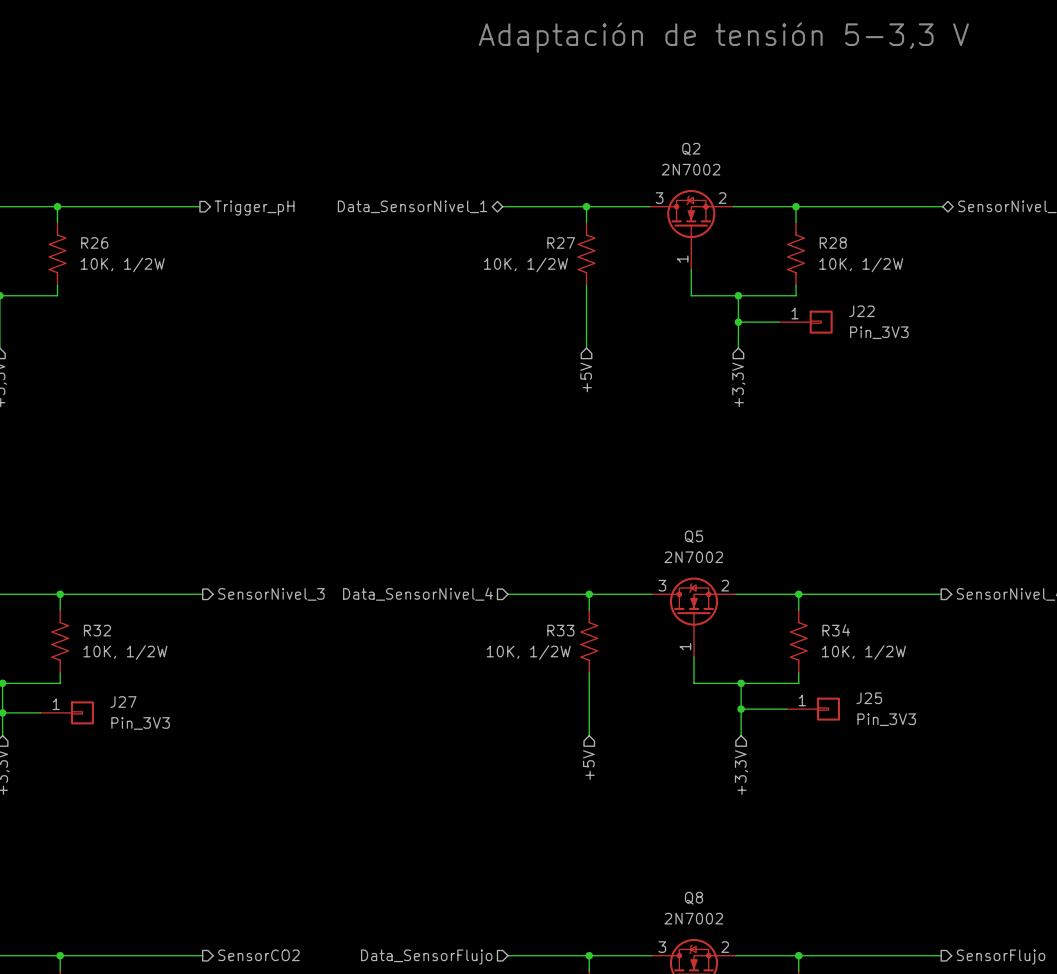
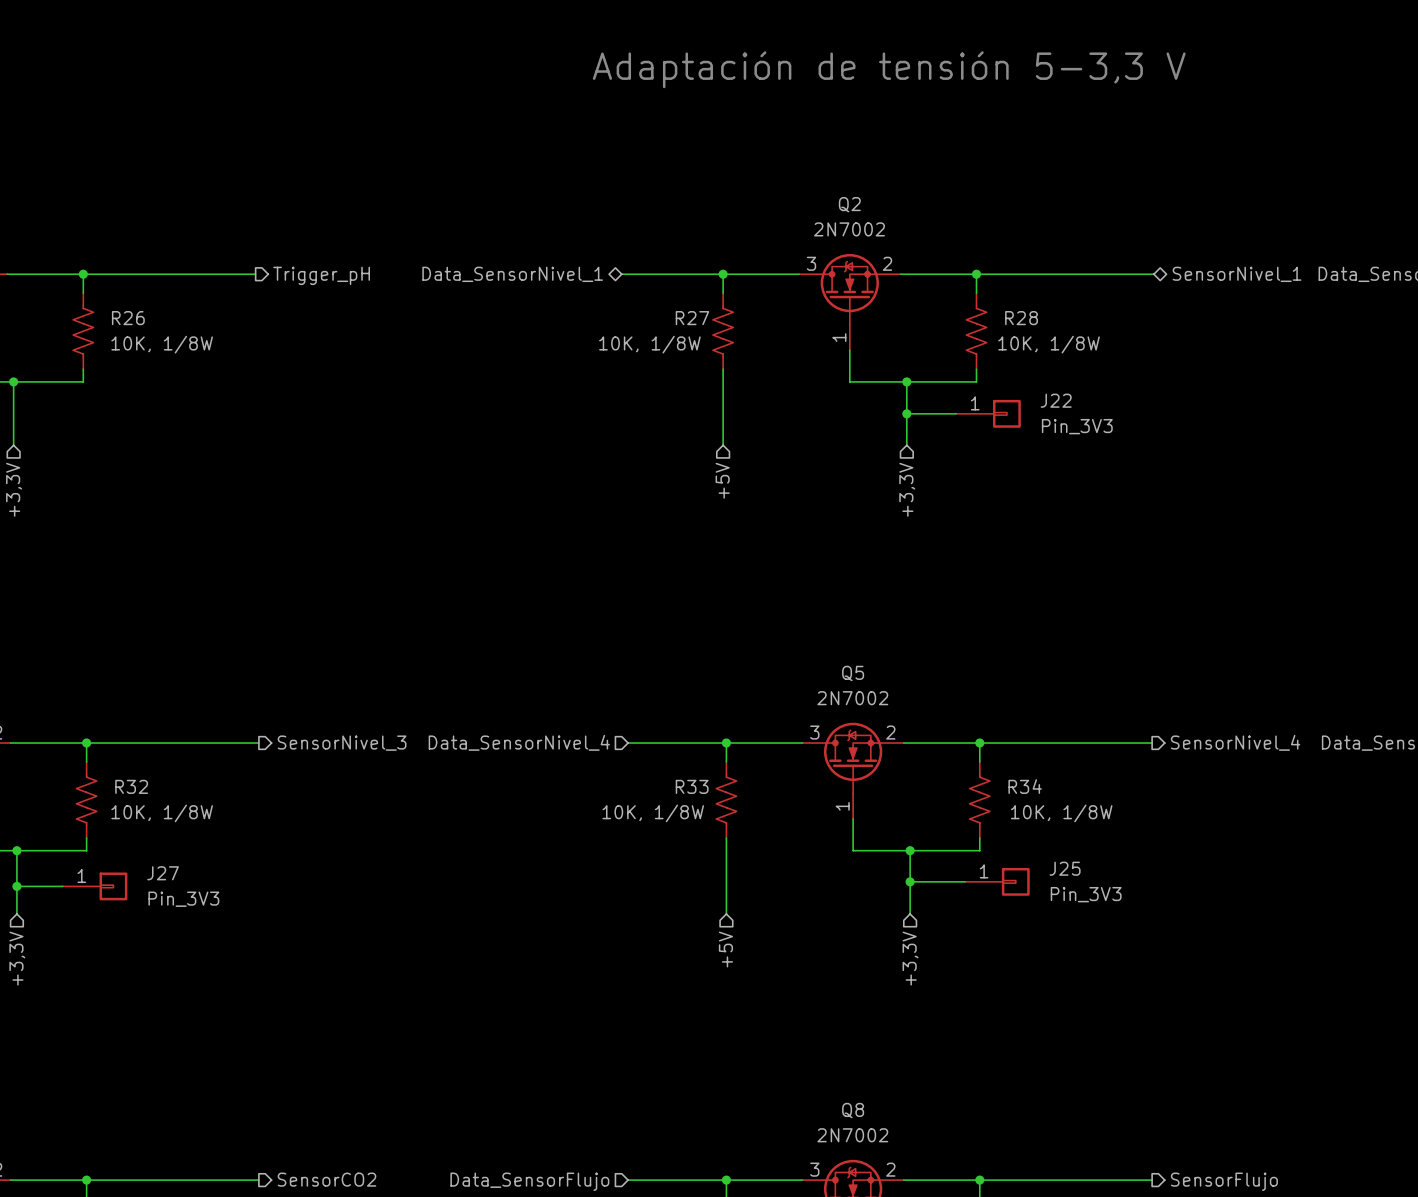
R26 value: 10K, 1/2W (122, 264) -> 10K, 1/8W (162, 344)
R27 value: 10K, 1/2W (525, 264) -> 10K, 1/8W (649, 344)
R28 value: 10K, 1/2W (861, 264) -> 10K, 1/8W (1049, 344)
R32 value: 10K, 1/2W (125, 652) -> 10K, 1/8W (162, 813)
R33 value: 10K, 1/2W (528, 652) -> 10K, 1/8W (653, 813)
R34 value: 10K, 1/2W (863, 652) -> 10K, 1/8W (1061, 813)

